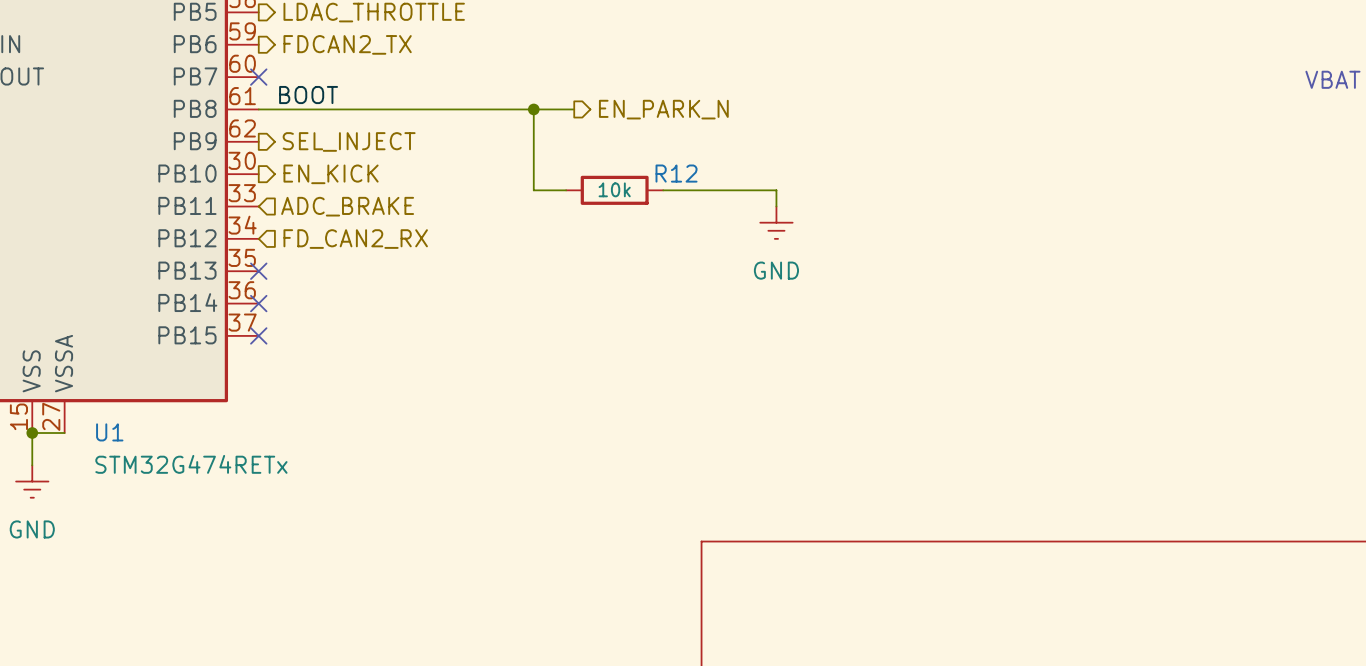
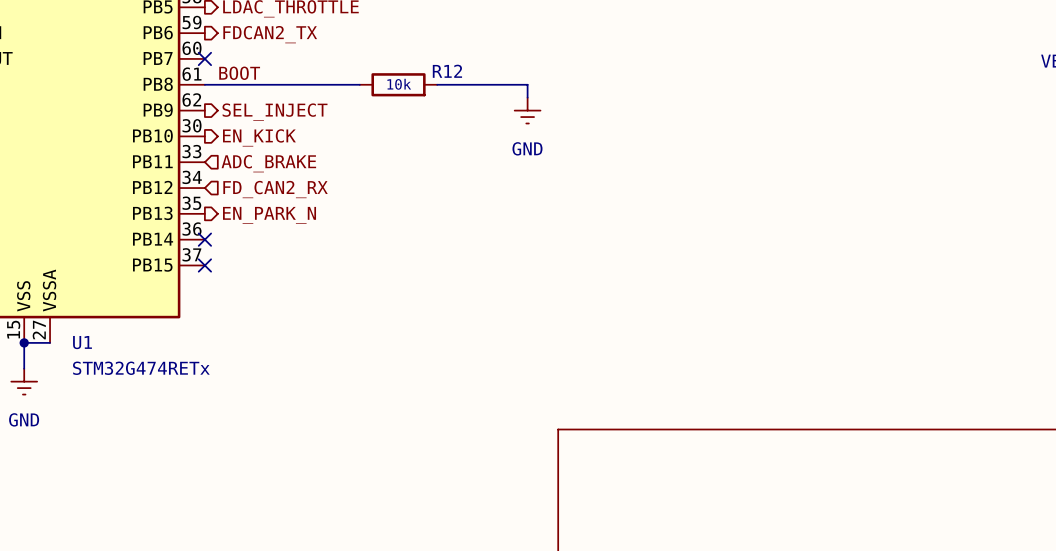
wire: (452, 109) (549, 109) -> none
wire: (533, 109) (533, 190) (566, 190) -> none
junction: (533, 109) -> none
wire: none -> (456, 84) (527, 84) (527, 97)
hierarchical label: EN_PARK_N (663, 109) -> none
R12 position: (614, 190) -> (398, 84)
wire: (663, 190) (776, 190) (776, 206) -> none
power symbol position: GND (776, 222) -> GND (527, 110)
no-connect mark: (258, 271) -> none
hierarchical label: none -> EN_PARK_N (269, 215)

